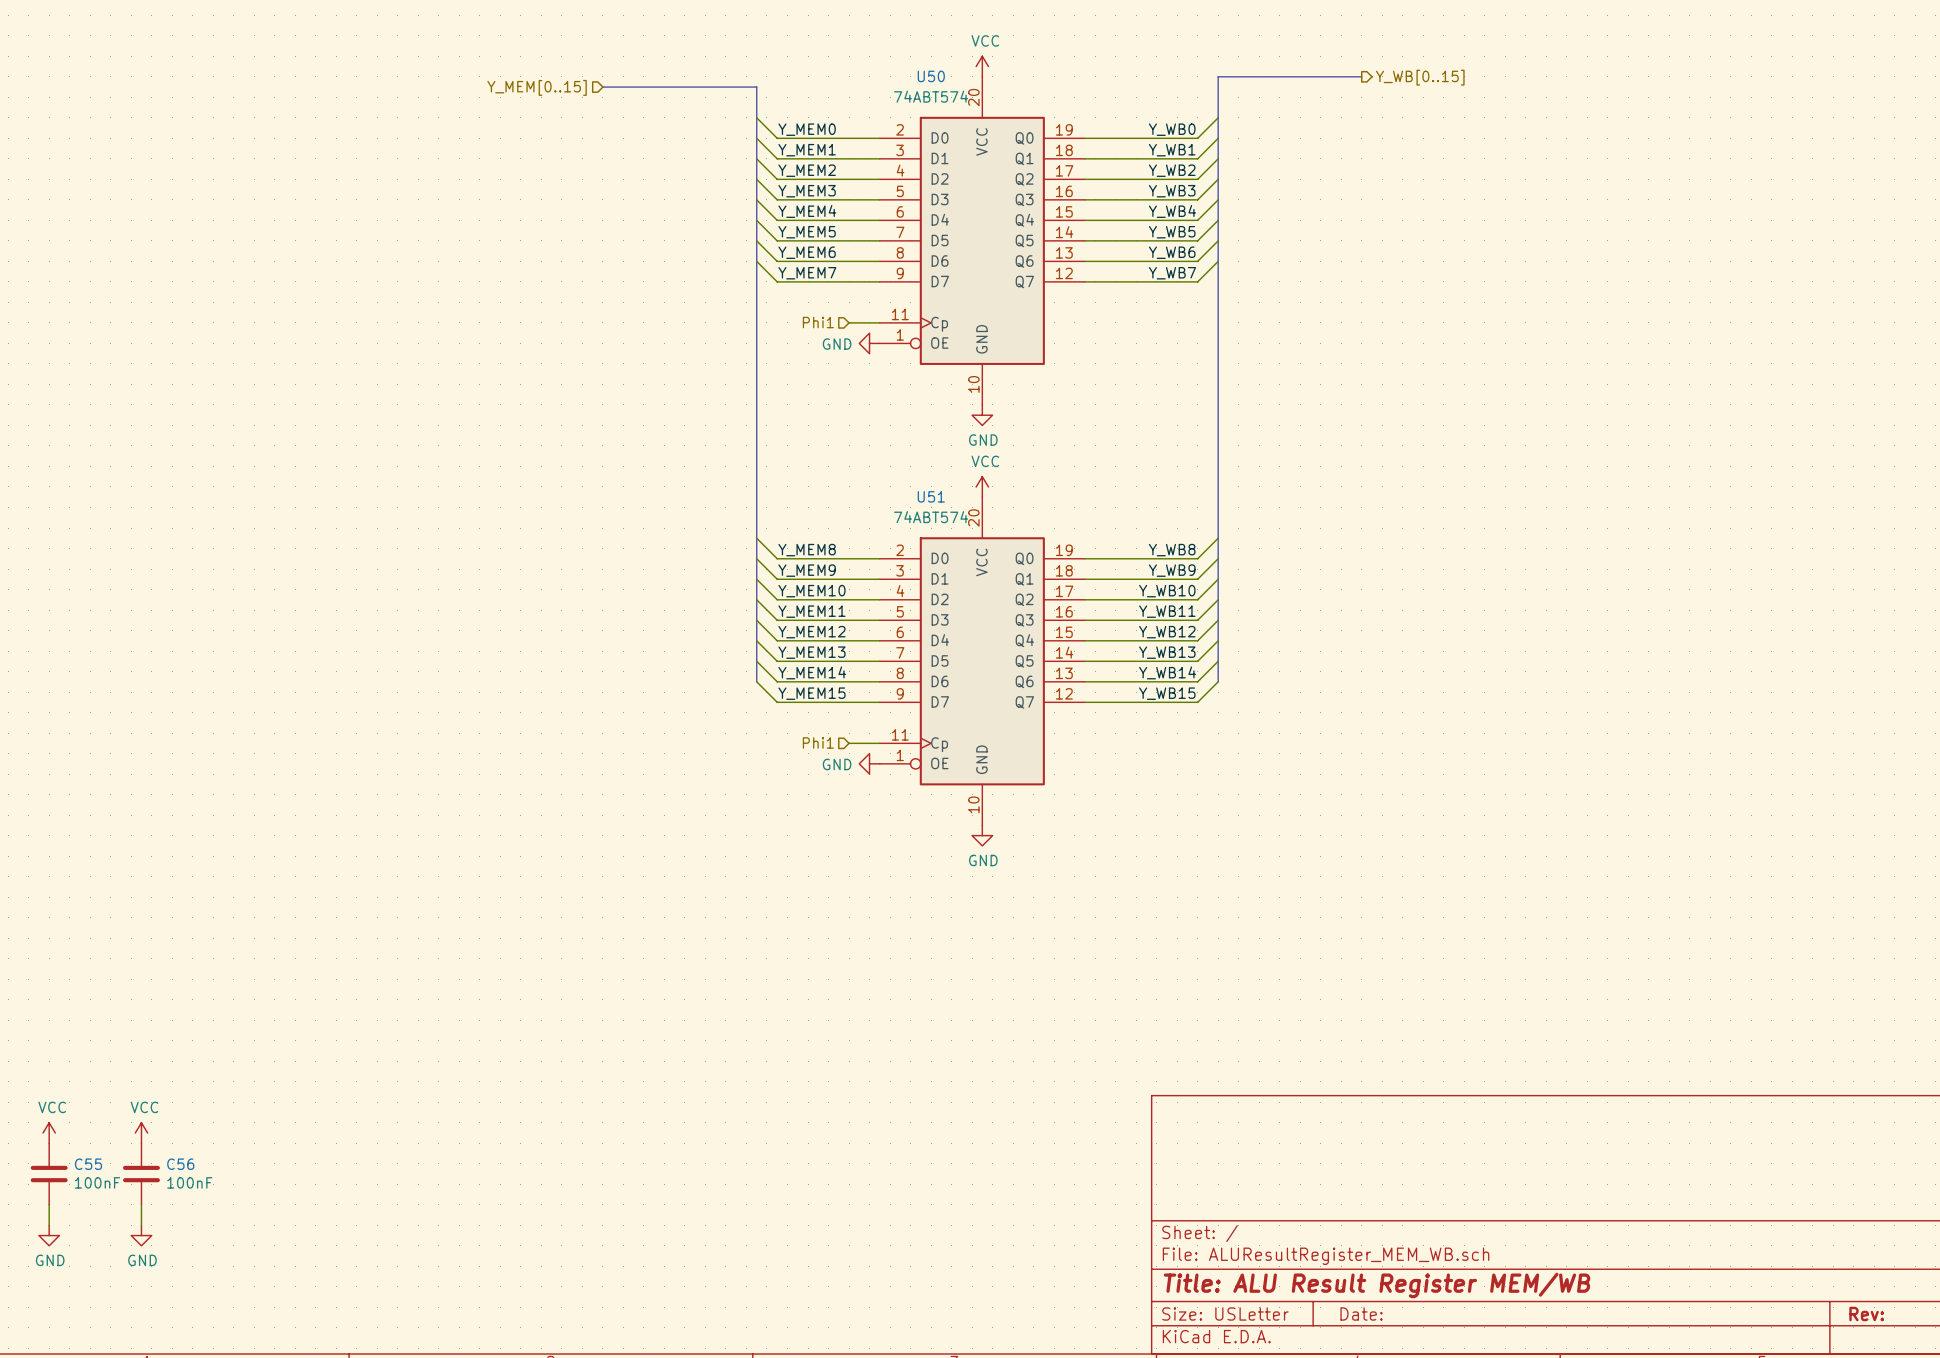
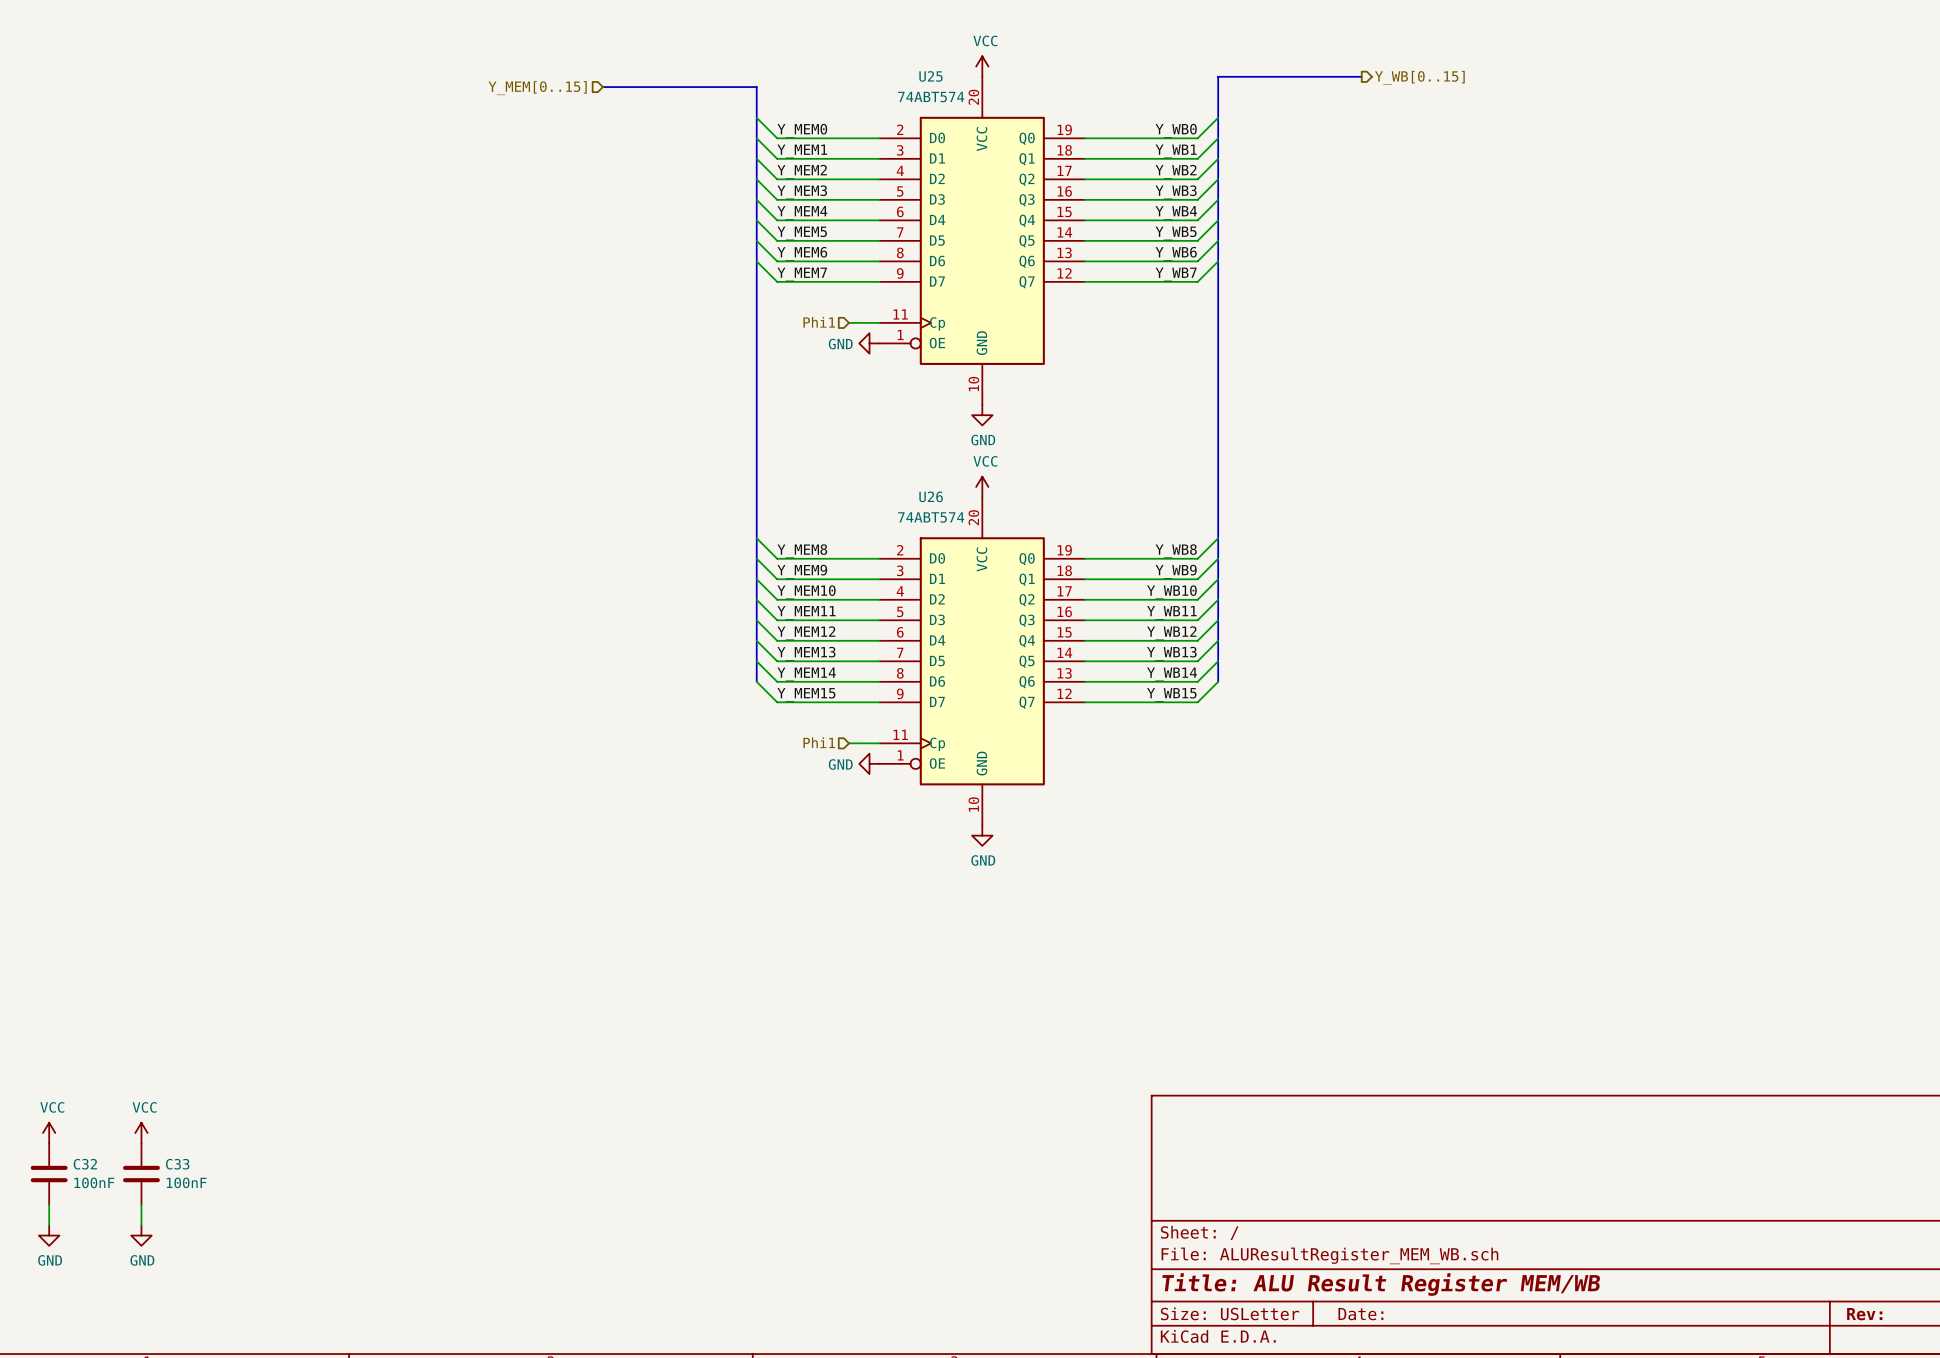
U50 name: U50 (931, 76) -> U25 (930, 76)
U51 name: U51 (931, 496) -> U26 (931, 496)
C55 name: C55 (88, 1164) -> C32 (85, 1164)
C56 name: C56 (180, 1164) -> C33 (177, 1164)

